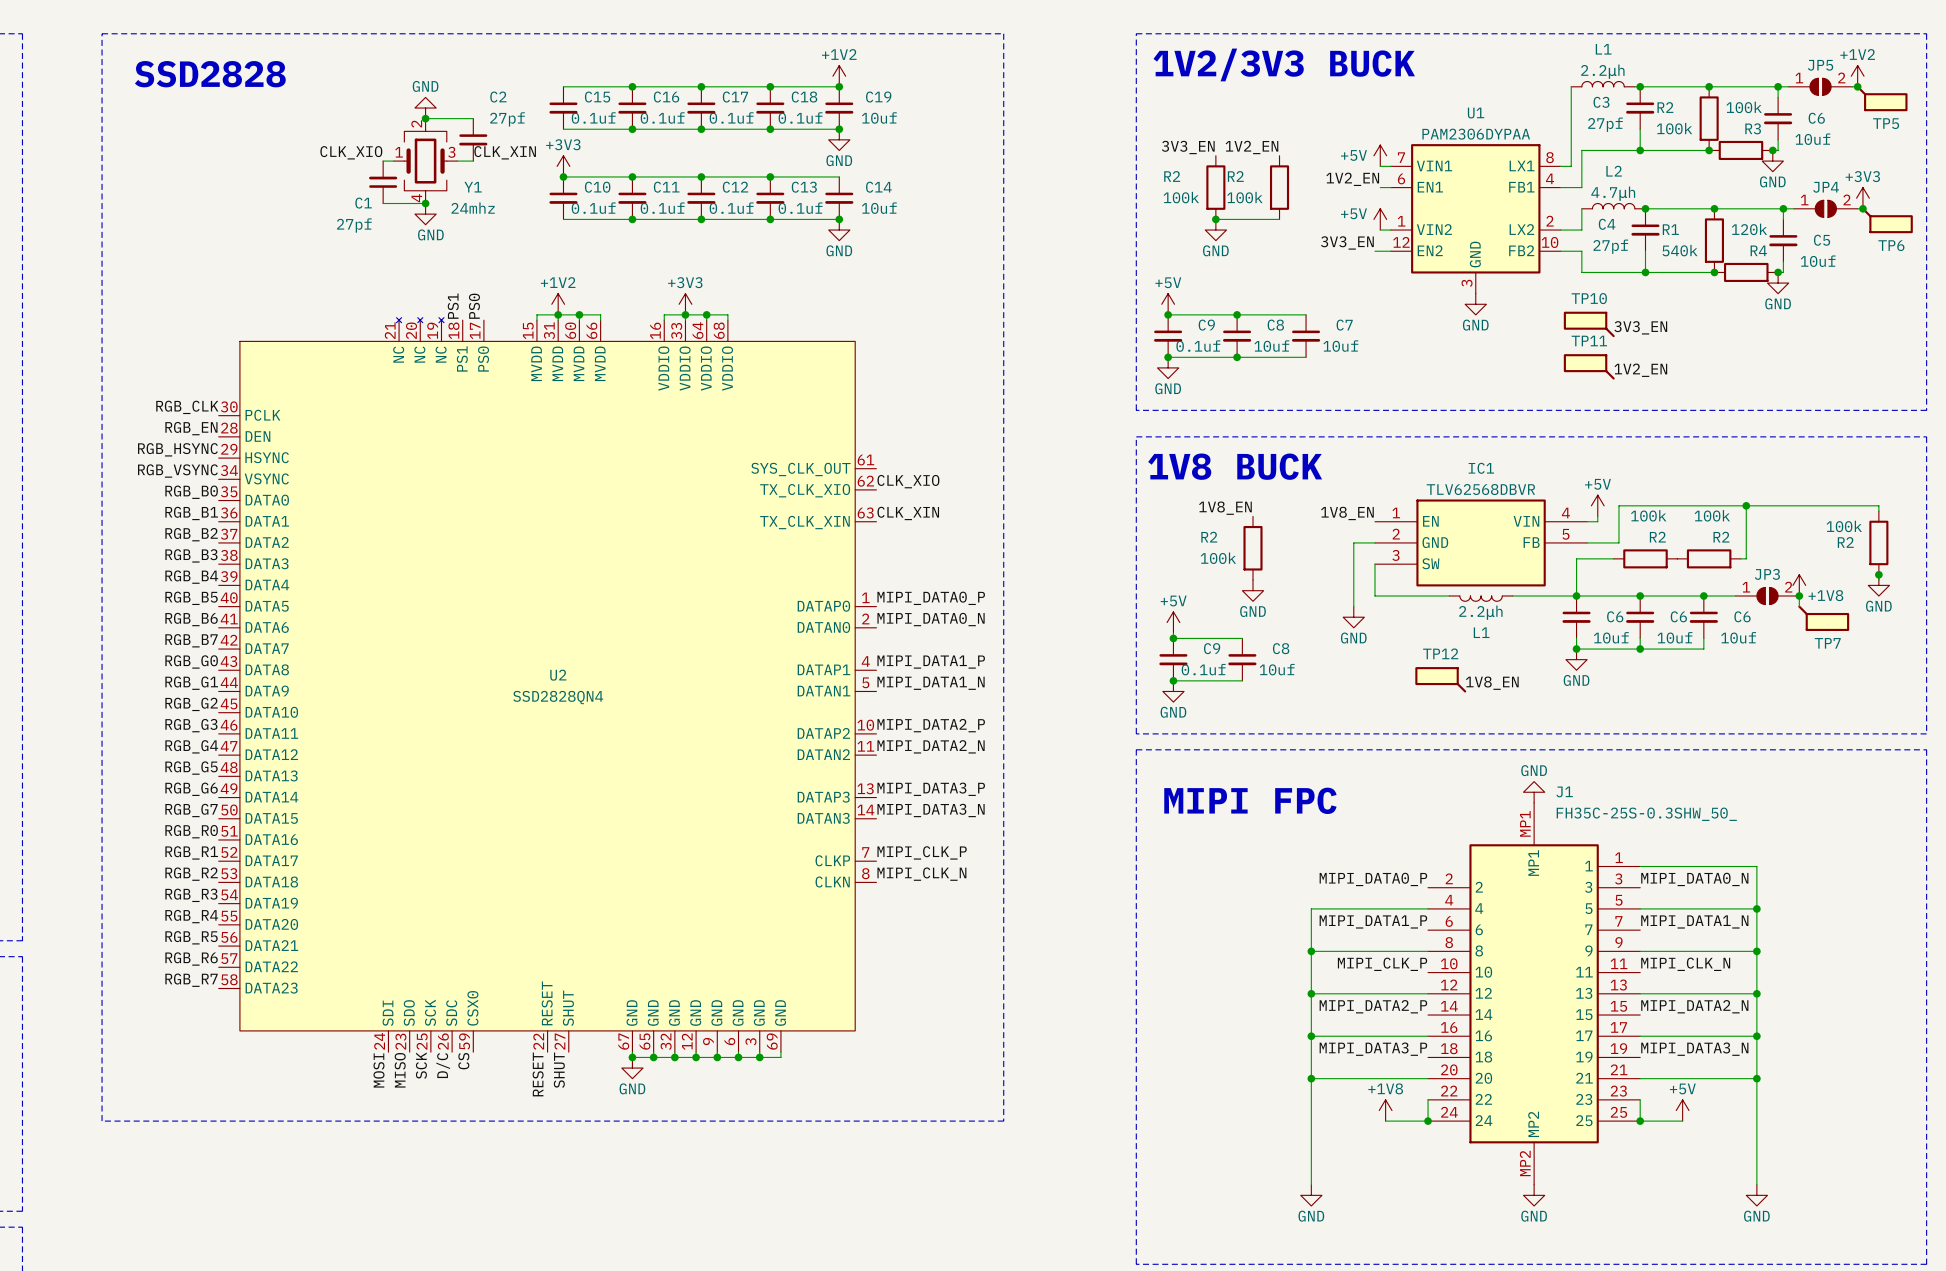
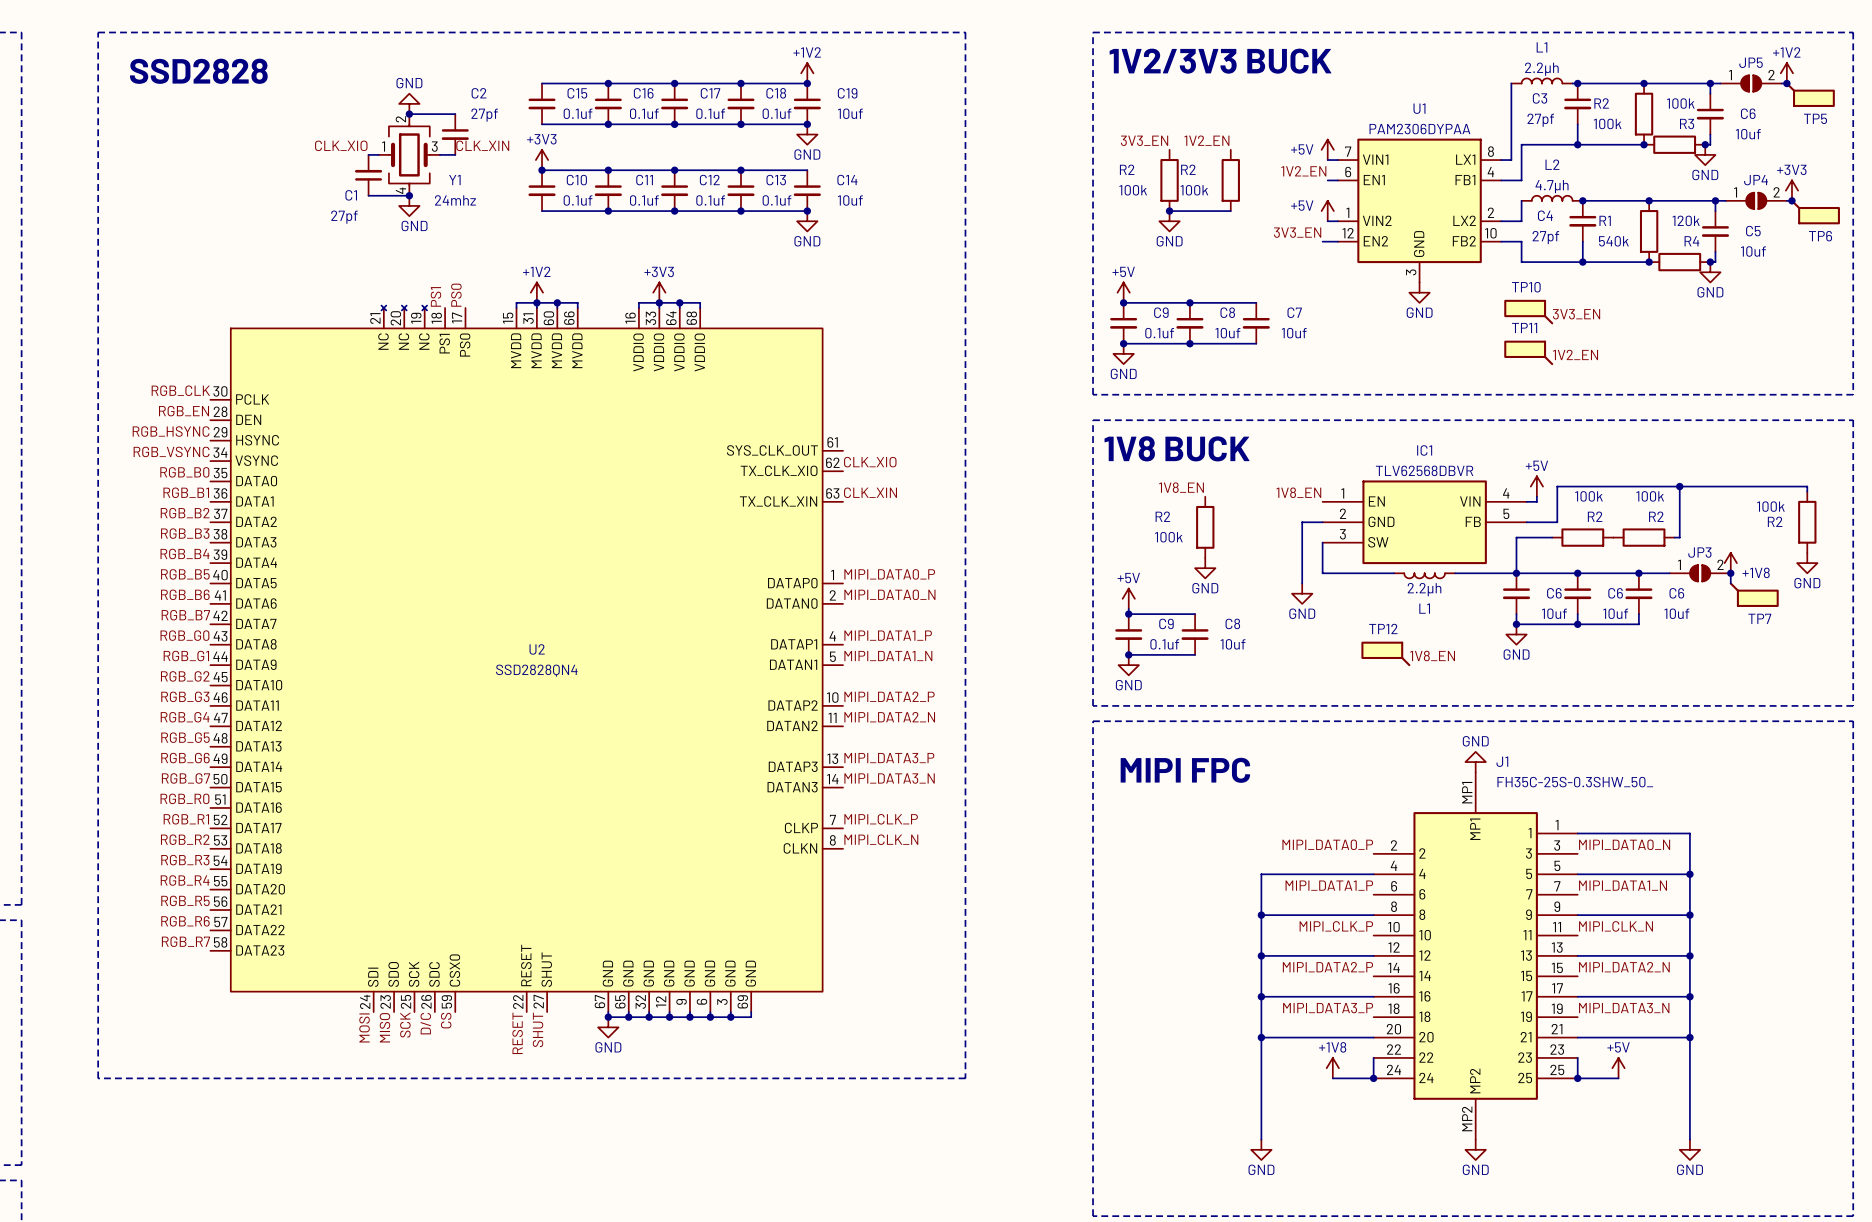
junction: (1878, 574) -> none

